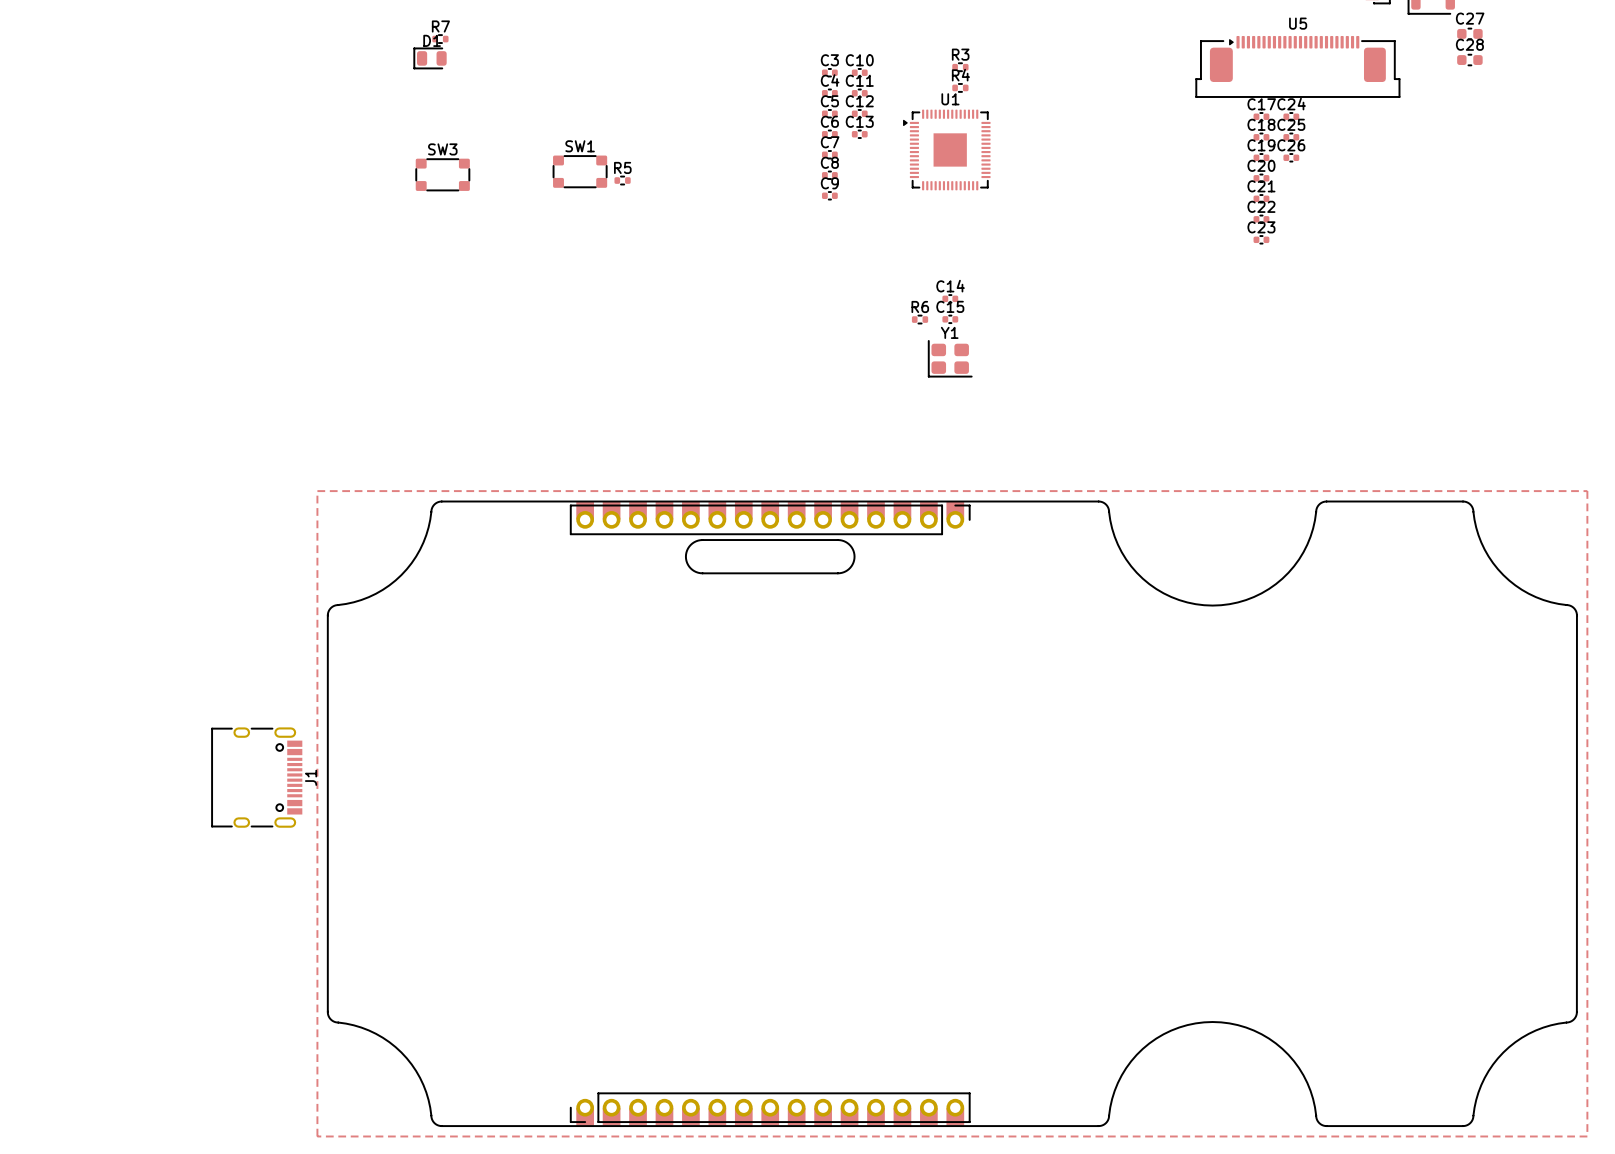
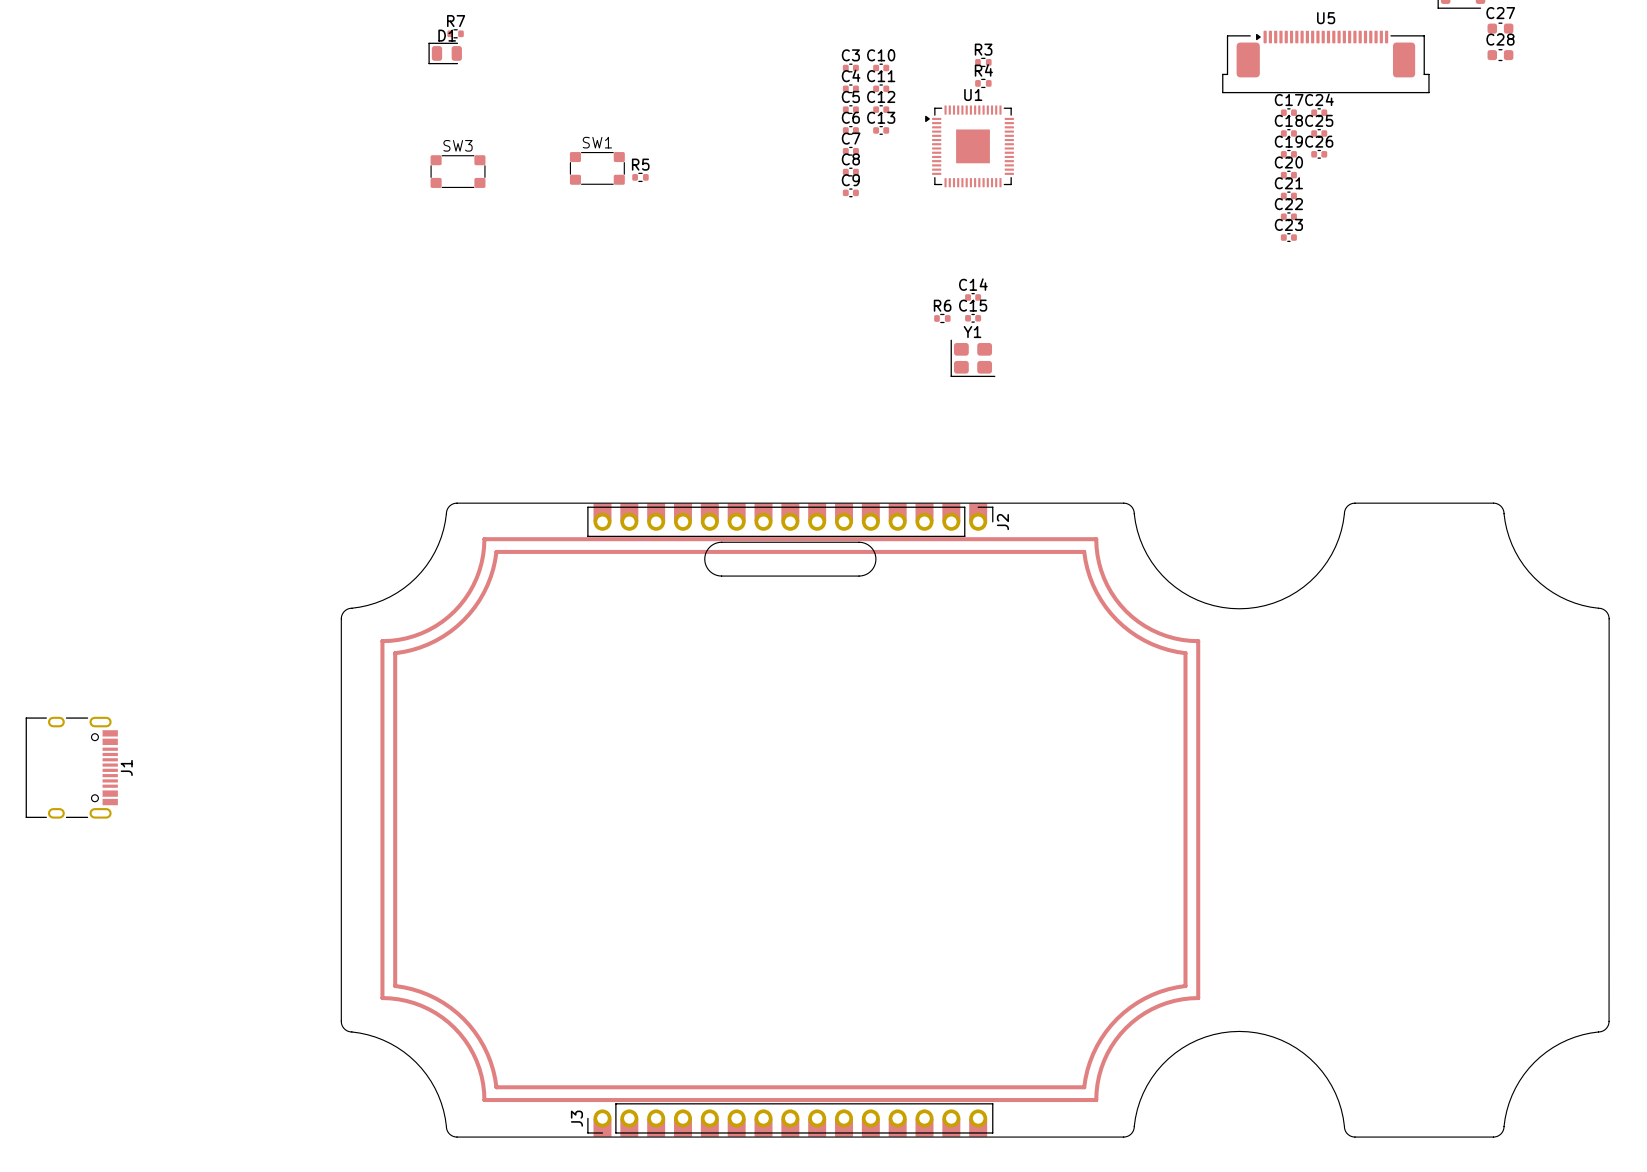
zone outline: (317, 491) (1587, 491) (1587, 1136) (317, 1136) (317, 491) -> none
J2 name: none -> J2 (1002, 522)
track: none -> (484, 539) (1096, 539) (1097, 555) (1104, 578) (1111, 592) (1126, 611) (1144, 626) (1159, 633) (1182, 639) (1198, 641) (1198, 998) (1182, 999) (1159, 1005) (1144, 1013) (1126, 1027) (1111, 1046) (1104, 1061) (1099, 1076) (1096, 1100) (484, 1100) (481, 1076) (476, 1061) (469, 1046) (454, 1027) (442, 1017) (421, 1005) (398, 999) (382, 998) (382, 641) (398, 639) (421, 633) (435, 626) (454, 611) (469, 592) (476, 578) (483, 555) (484, 539)
track: none -> (496, 551) (1084, 551) (1093, 585) (1105, 607) (1117, 620) (1144, 640) (1168, 650) (1185, 653) (1185, 986) (1152, 994) (1130, 1007) (1117, 1018) (1096, 1046) (1087, 1070) (1084, 1087) (496, 1087) (487, 1054) (474, 1031) (463, 1018) (443, 1002) (428, 994) (395, 986) (395, 653) (420, 647) (436, 640) (463, 620) (483, 592) (490, 577) (496, 551)
J1 position: (256, 777) -> (71, 767)
J3 name: none -> J3 (576, 1118)

